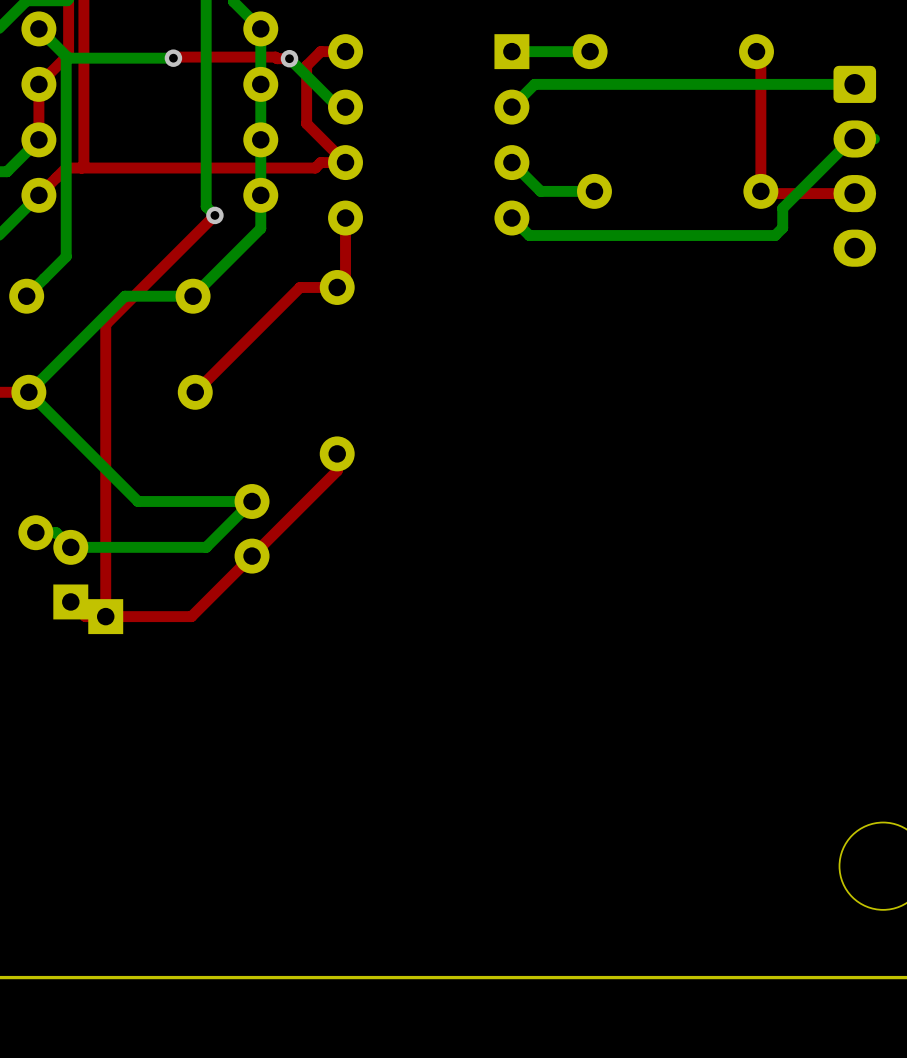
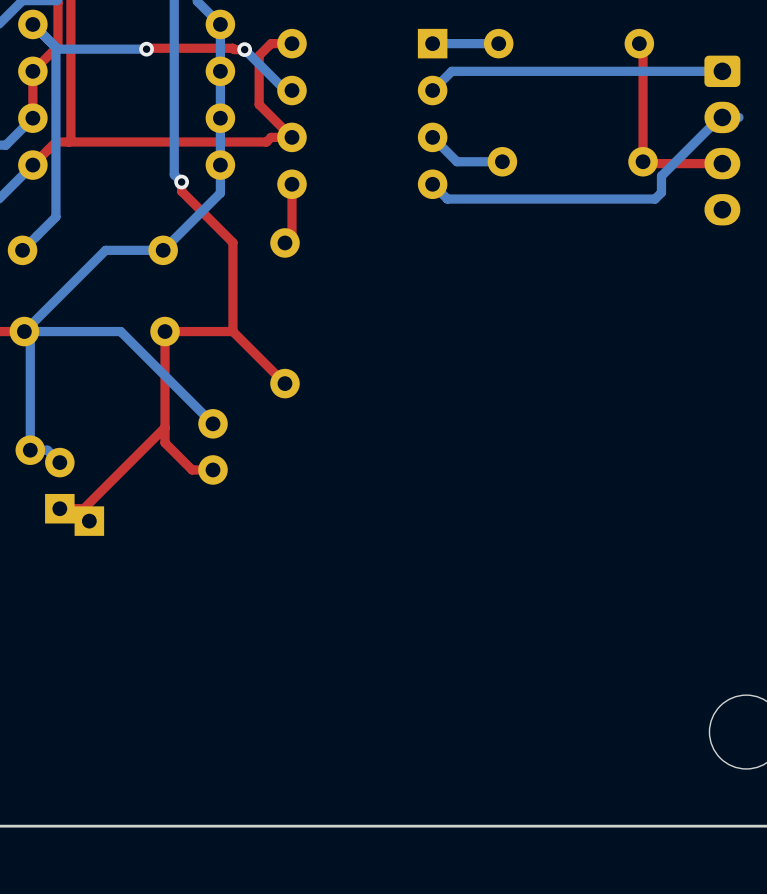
top track: (214, 215) (105, 324) (105, 616) -> (181, 182) (181, 191) (232, 242) (232, 331)
top track: (337, 287) (300, 287) (206, 381) -> none
bottom track: none -> (24, 331) (120, 331) (213, 423)
top track: none -> (232, 331) (165, 331) (165, 442) (192, 469) (213, 469)
top track: none -> (232, 331) (284, 383)
bottom track: (35, 399) (138, 501) (252, 501) (206, 547) (70, 547) -> (30, 337) (30, 450)
top track: (337, 453) (337, 470) (191, 616) (85, 616) (70, 601) -> (165, 427) (83, 508) (59, 508)

